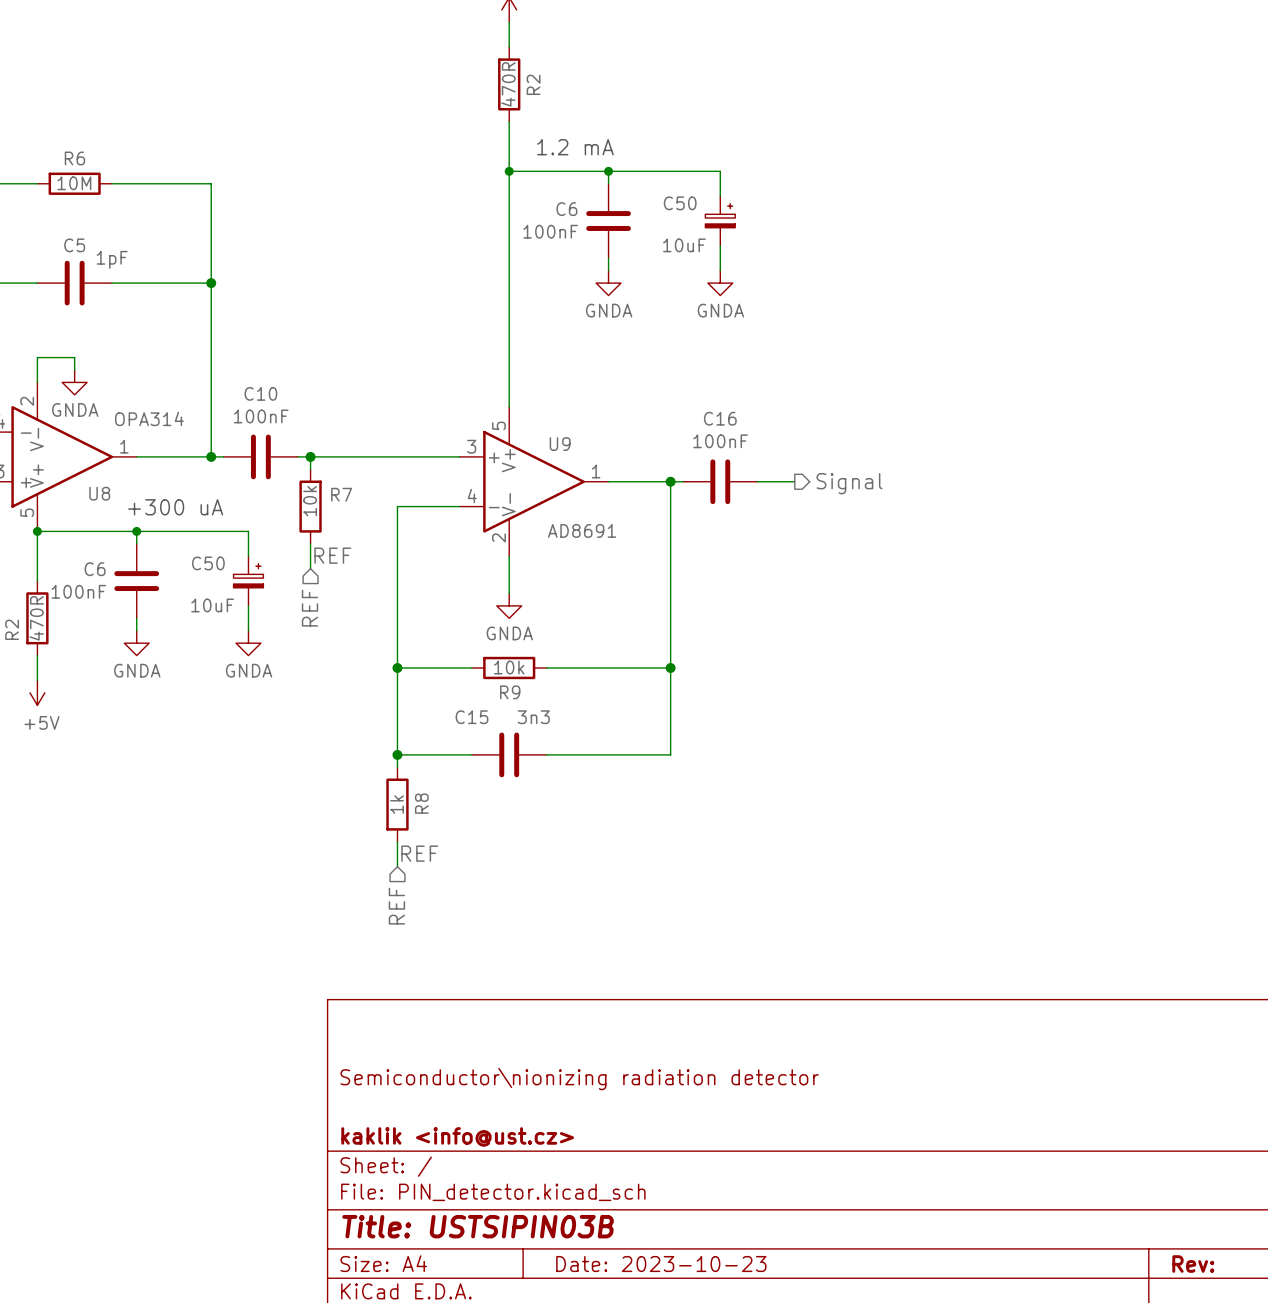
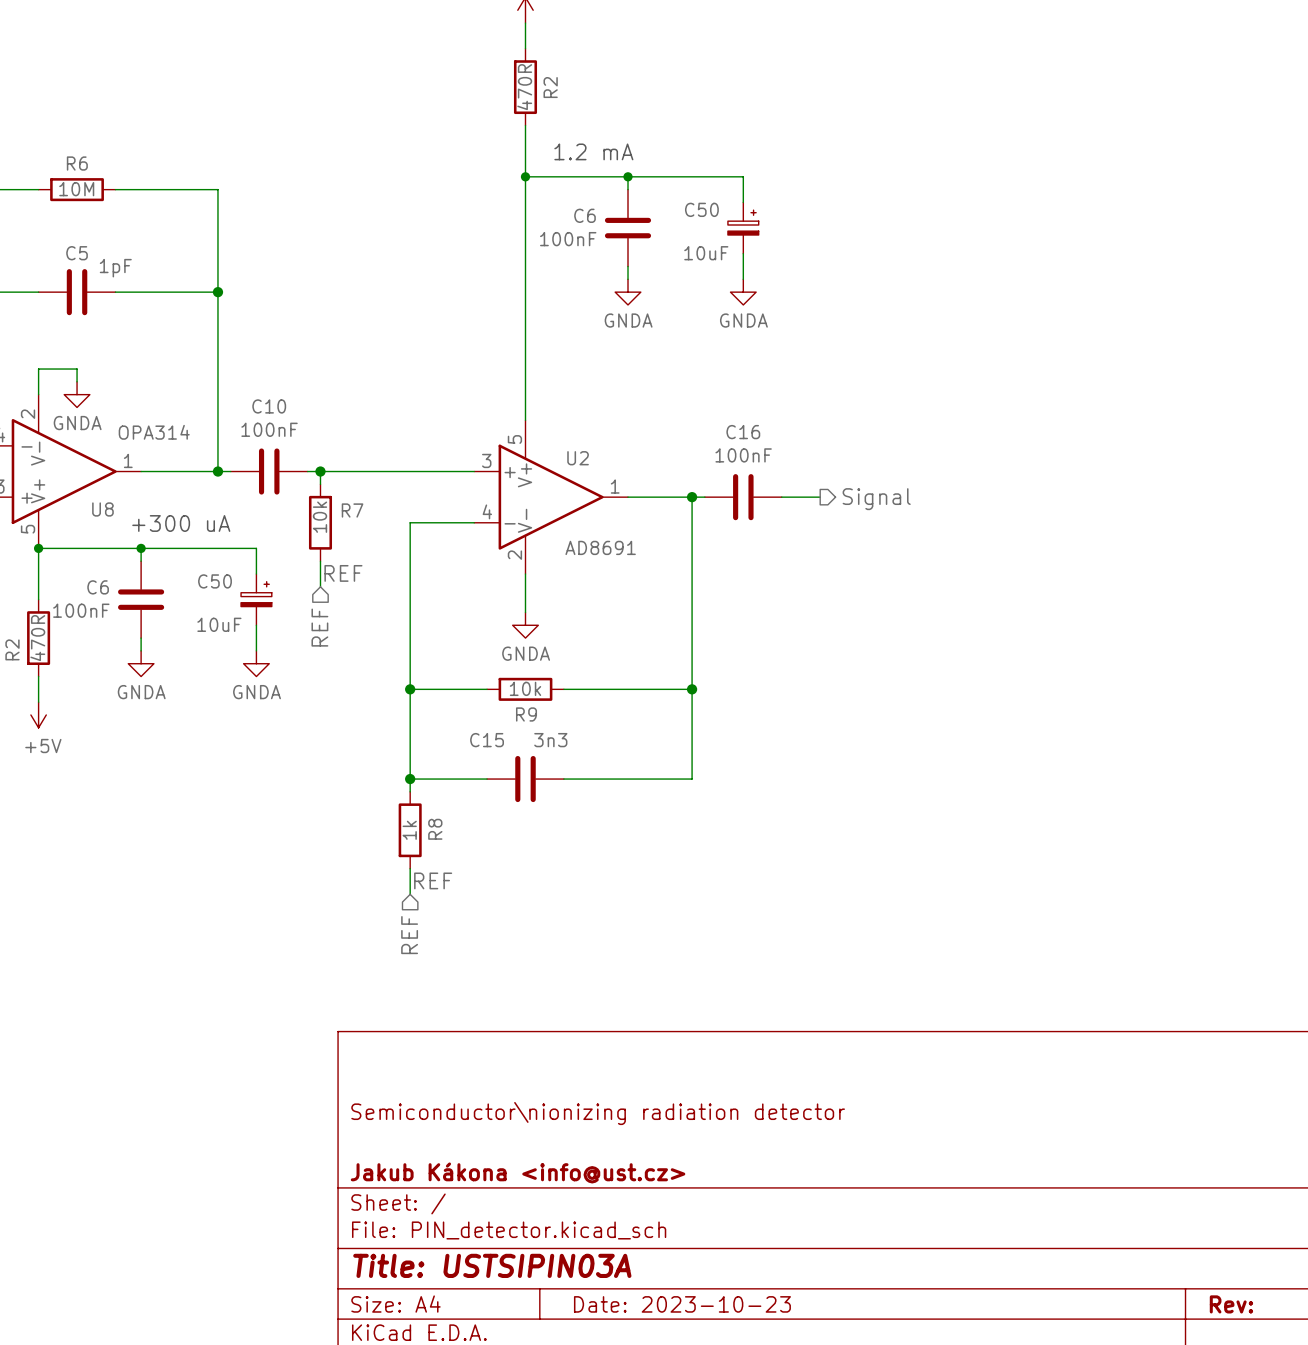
U9 name: U9 (560, 444) -> U2 (578, 458)
title block: kaklik <info@ust.cz> (457, 1136) -> Jakub Kákona <info@ust.cz> (518, 1172)
title block: Title: USTSIPIN03B (478, 1226) -> Title: USTSIPIN03A (492, 1265)

